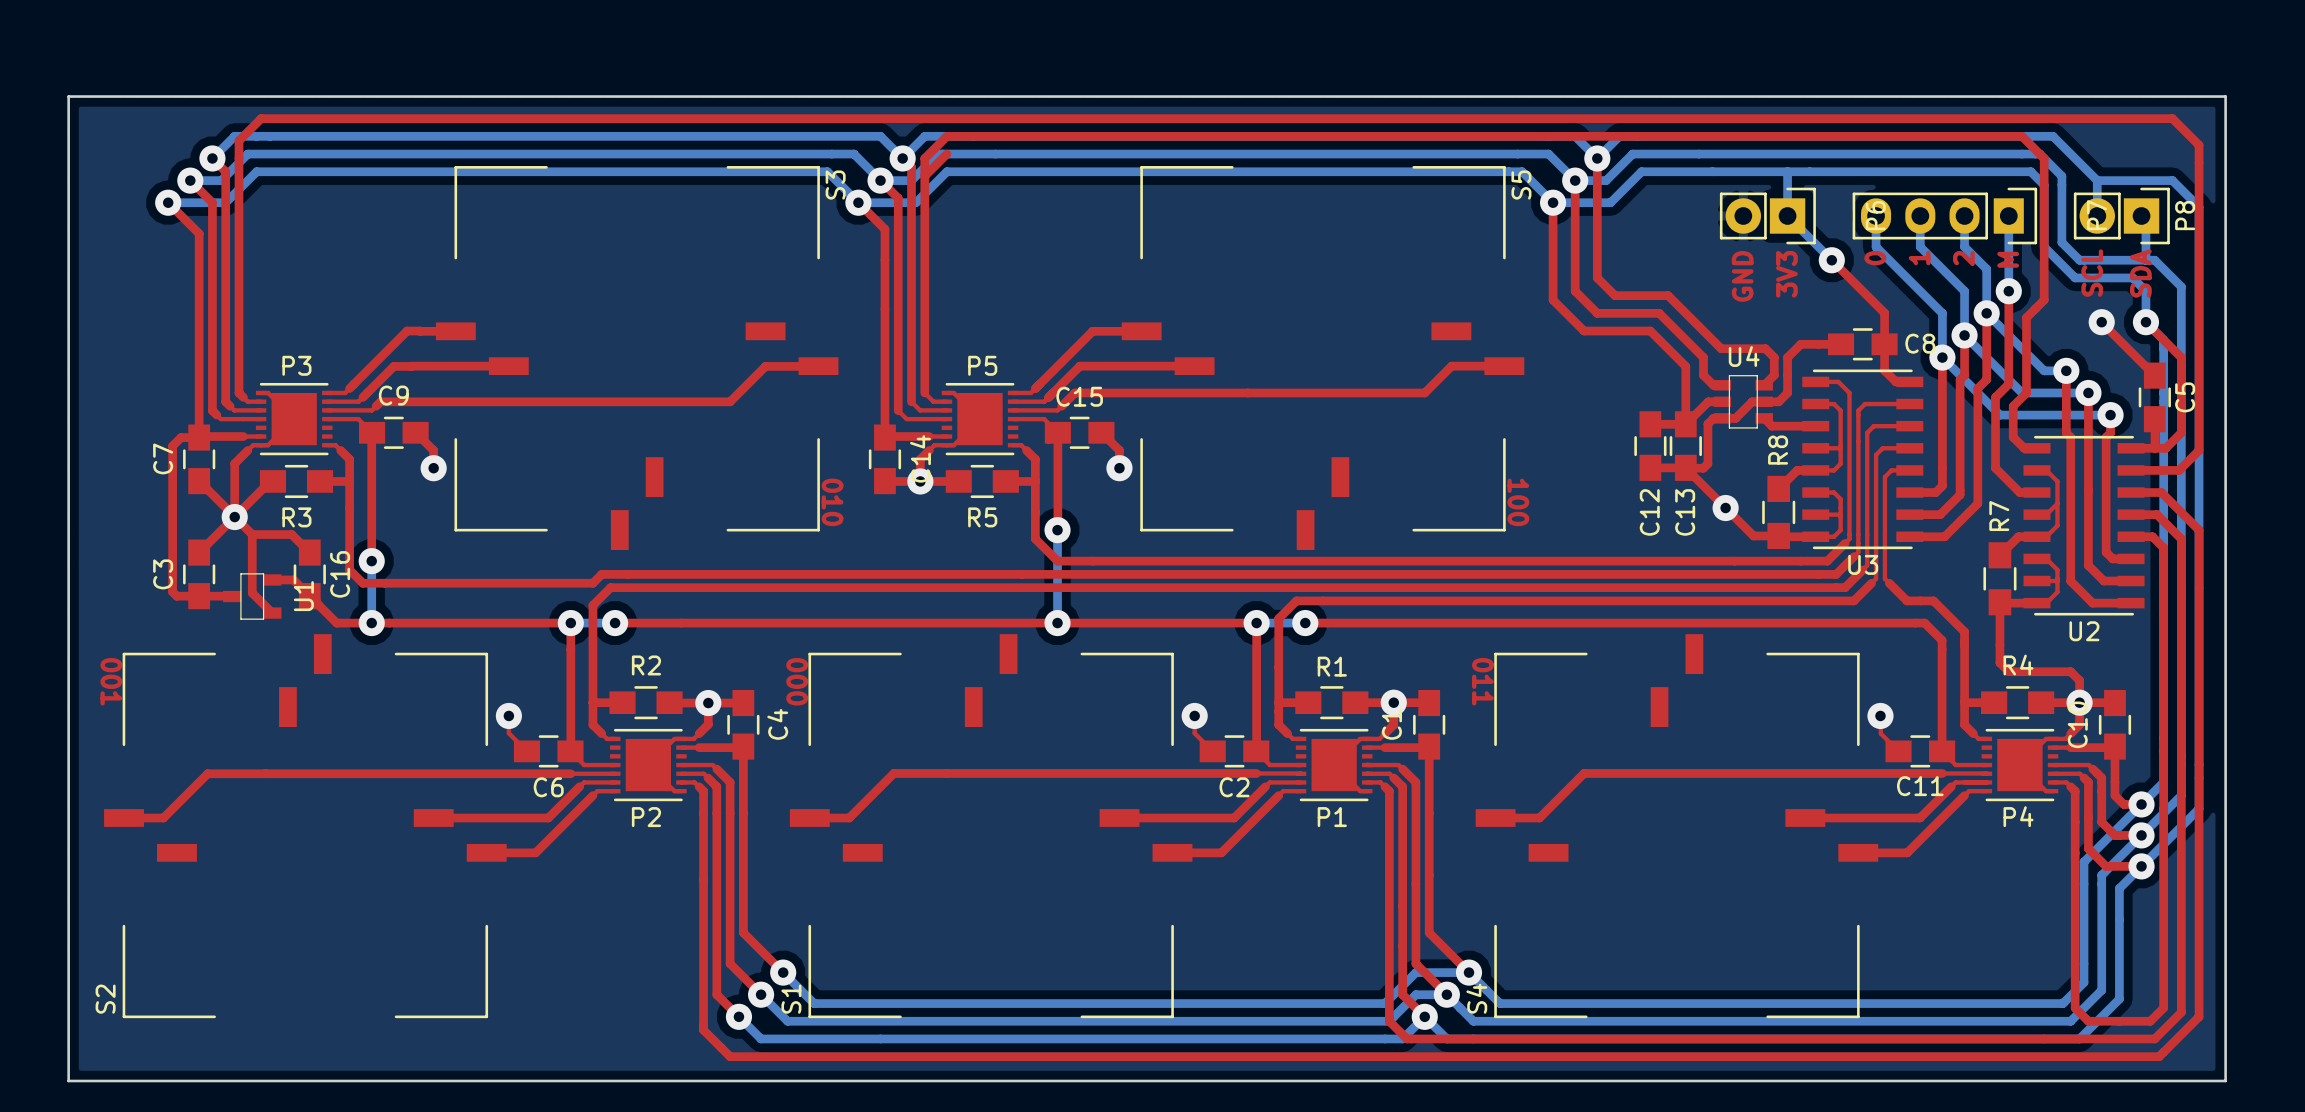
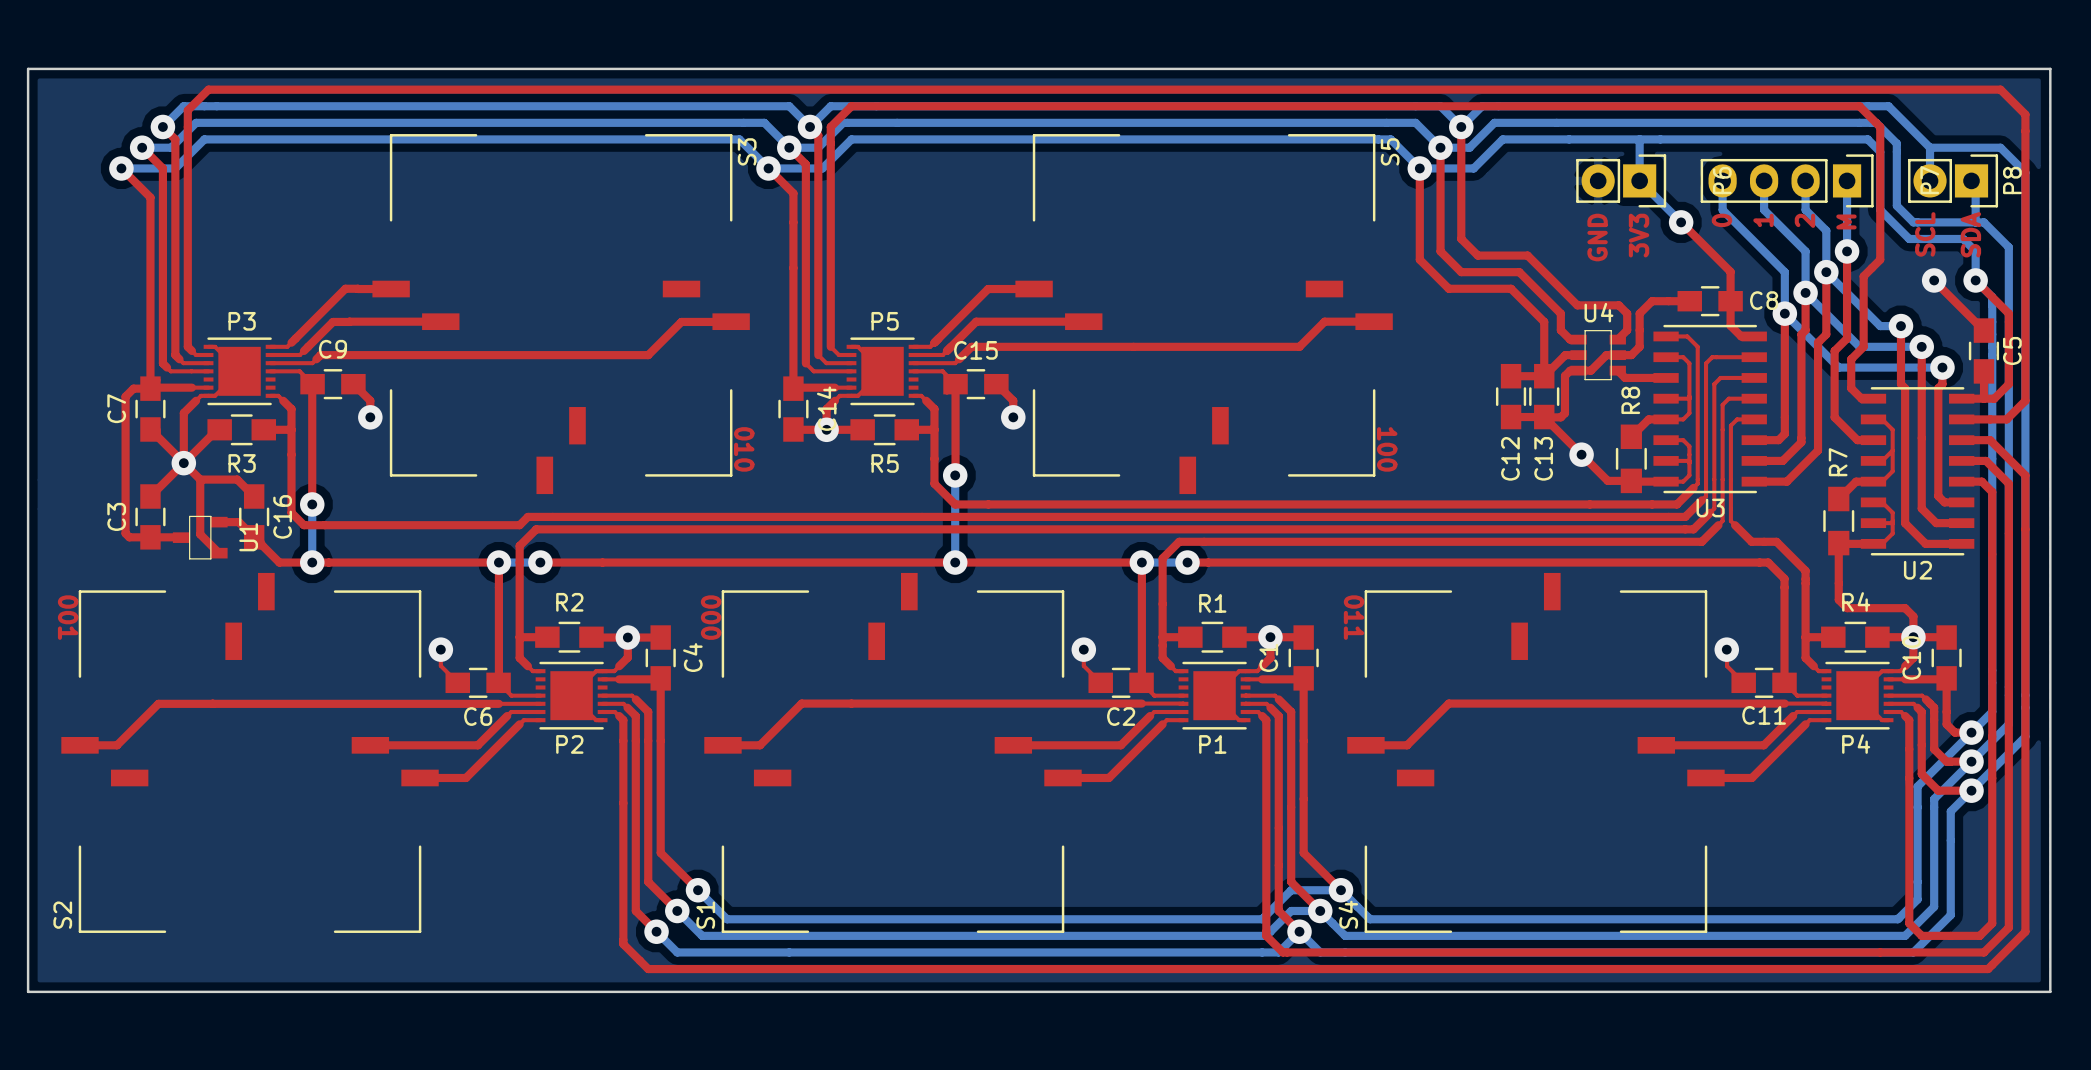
top track: (946, 154) (924, 176) (946, 154) -> none

